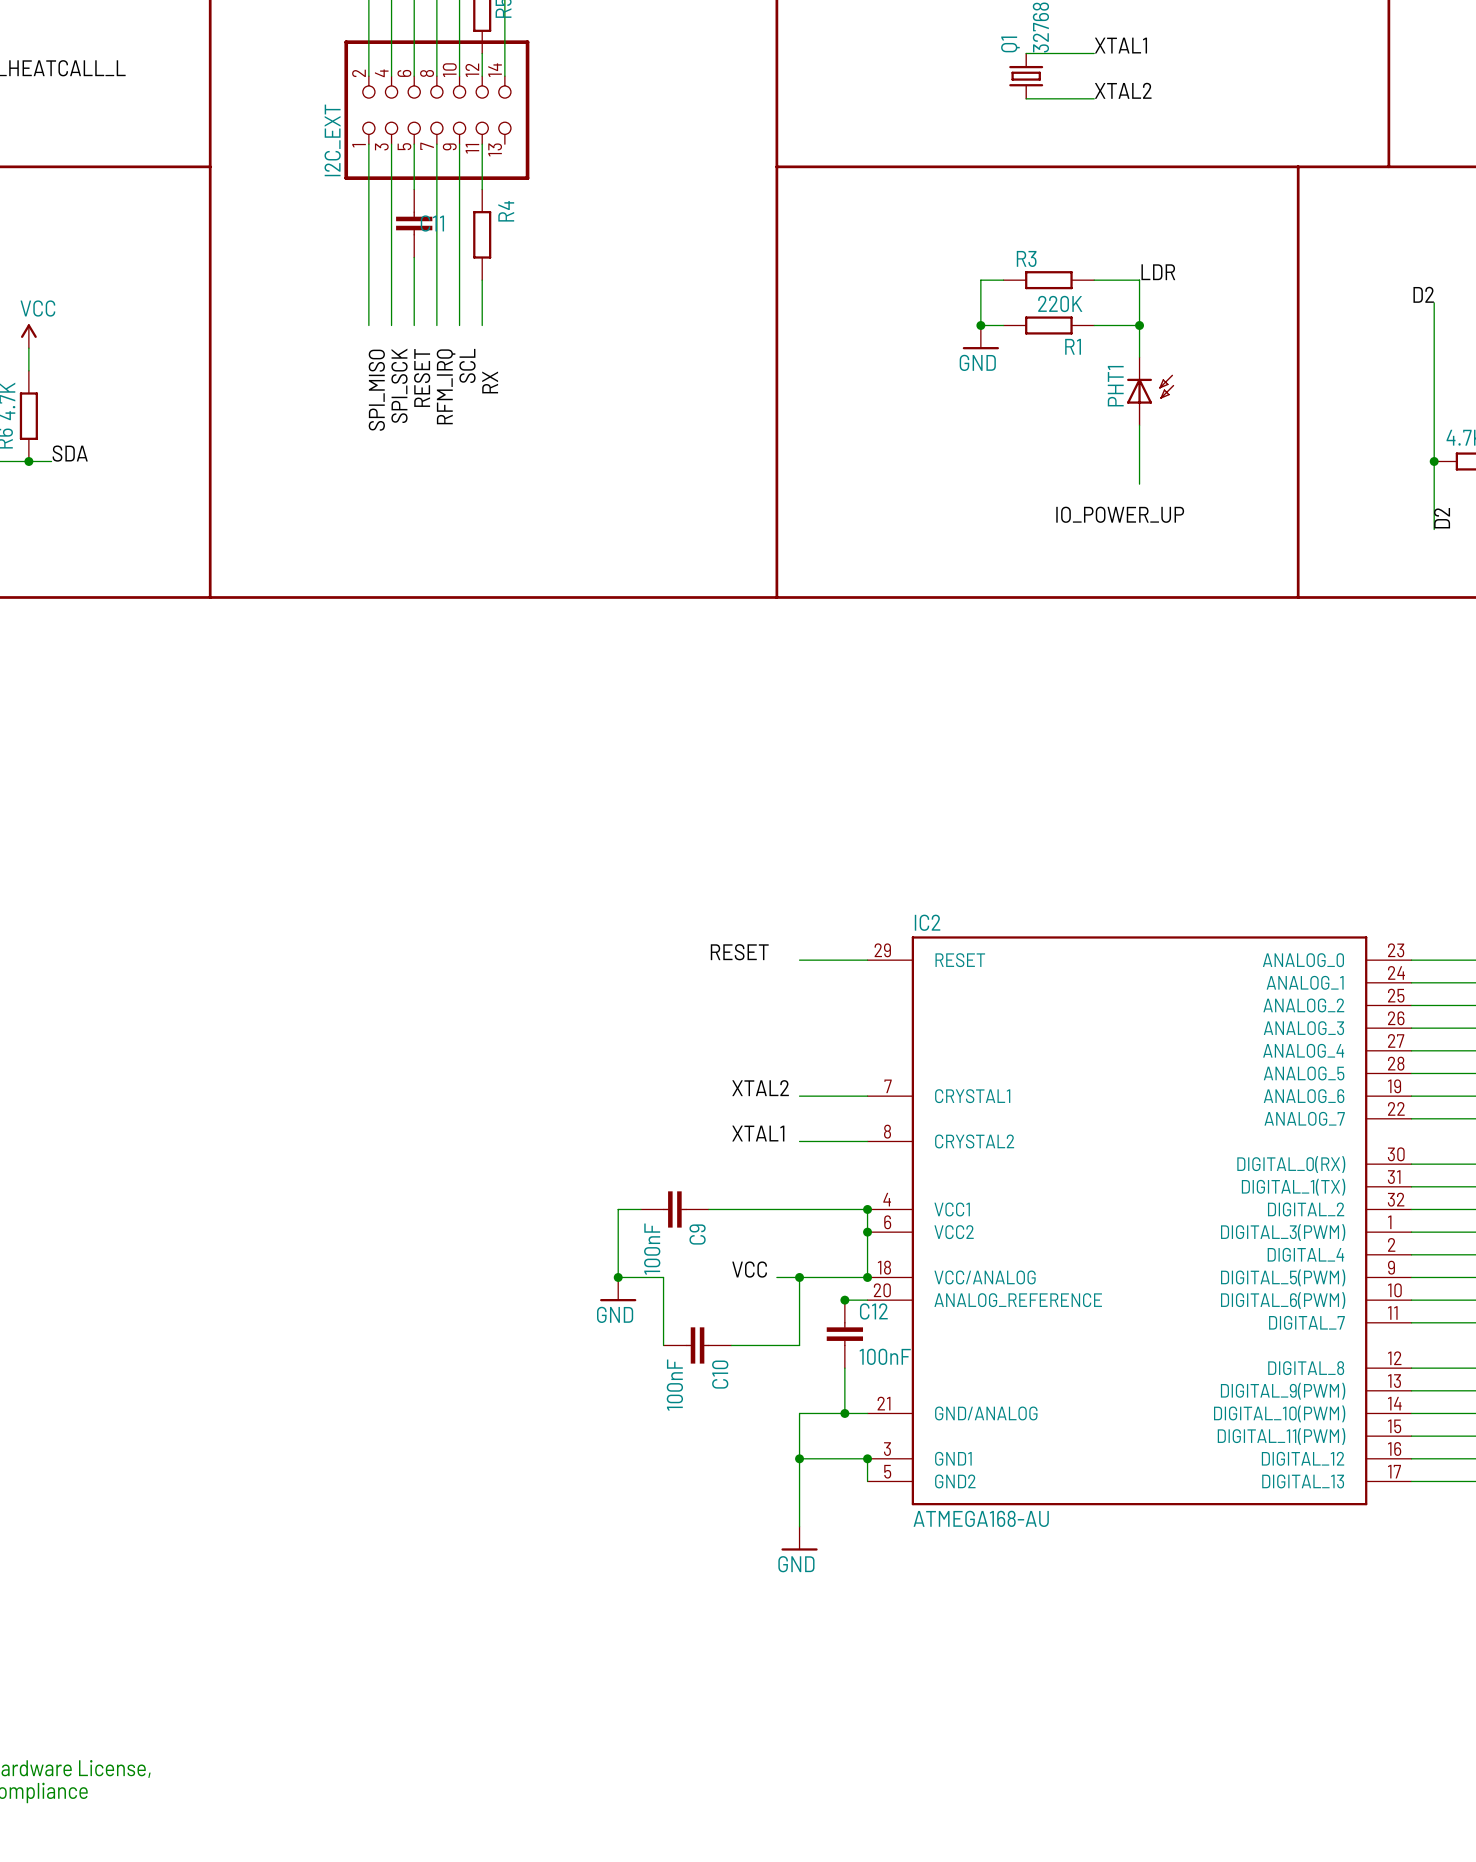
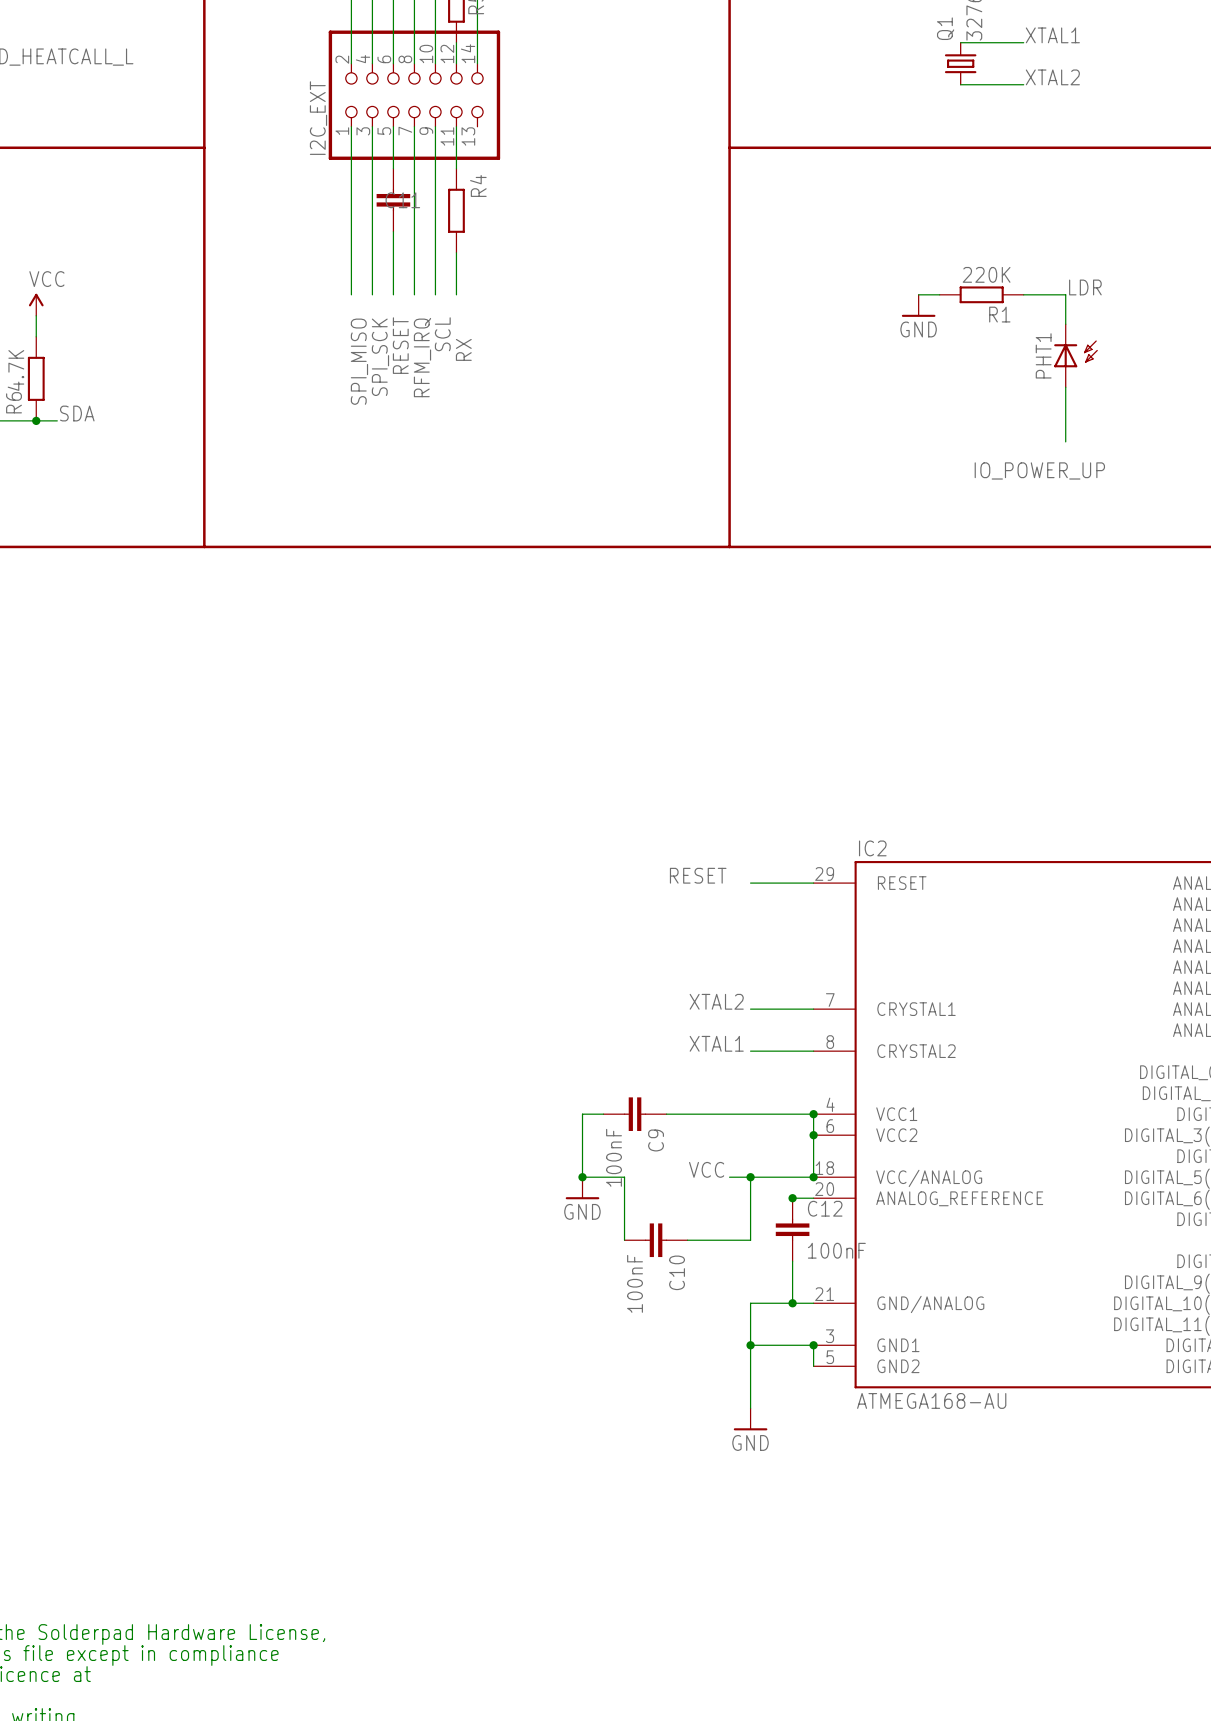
label position: LDR (1158, 272) -> LDR (1085, 287)
wire: (1003, 280) (980, 280) (980, 325) -> none
R3: (1048, 280) -> none
wire: (1094, 280) (1139, 280) (1139, 325) -> none
junction: (980, 325) -> none
junction: (1139, 325) -> none

